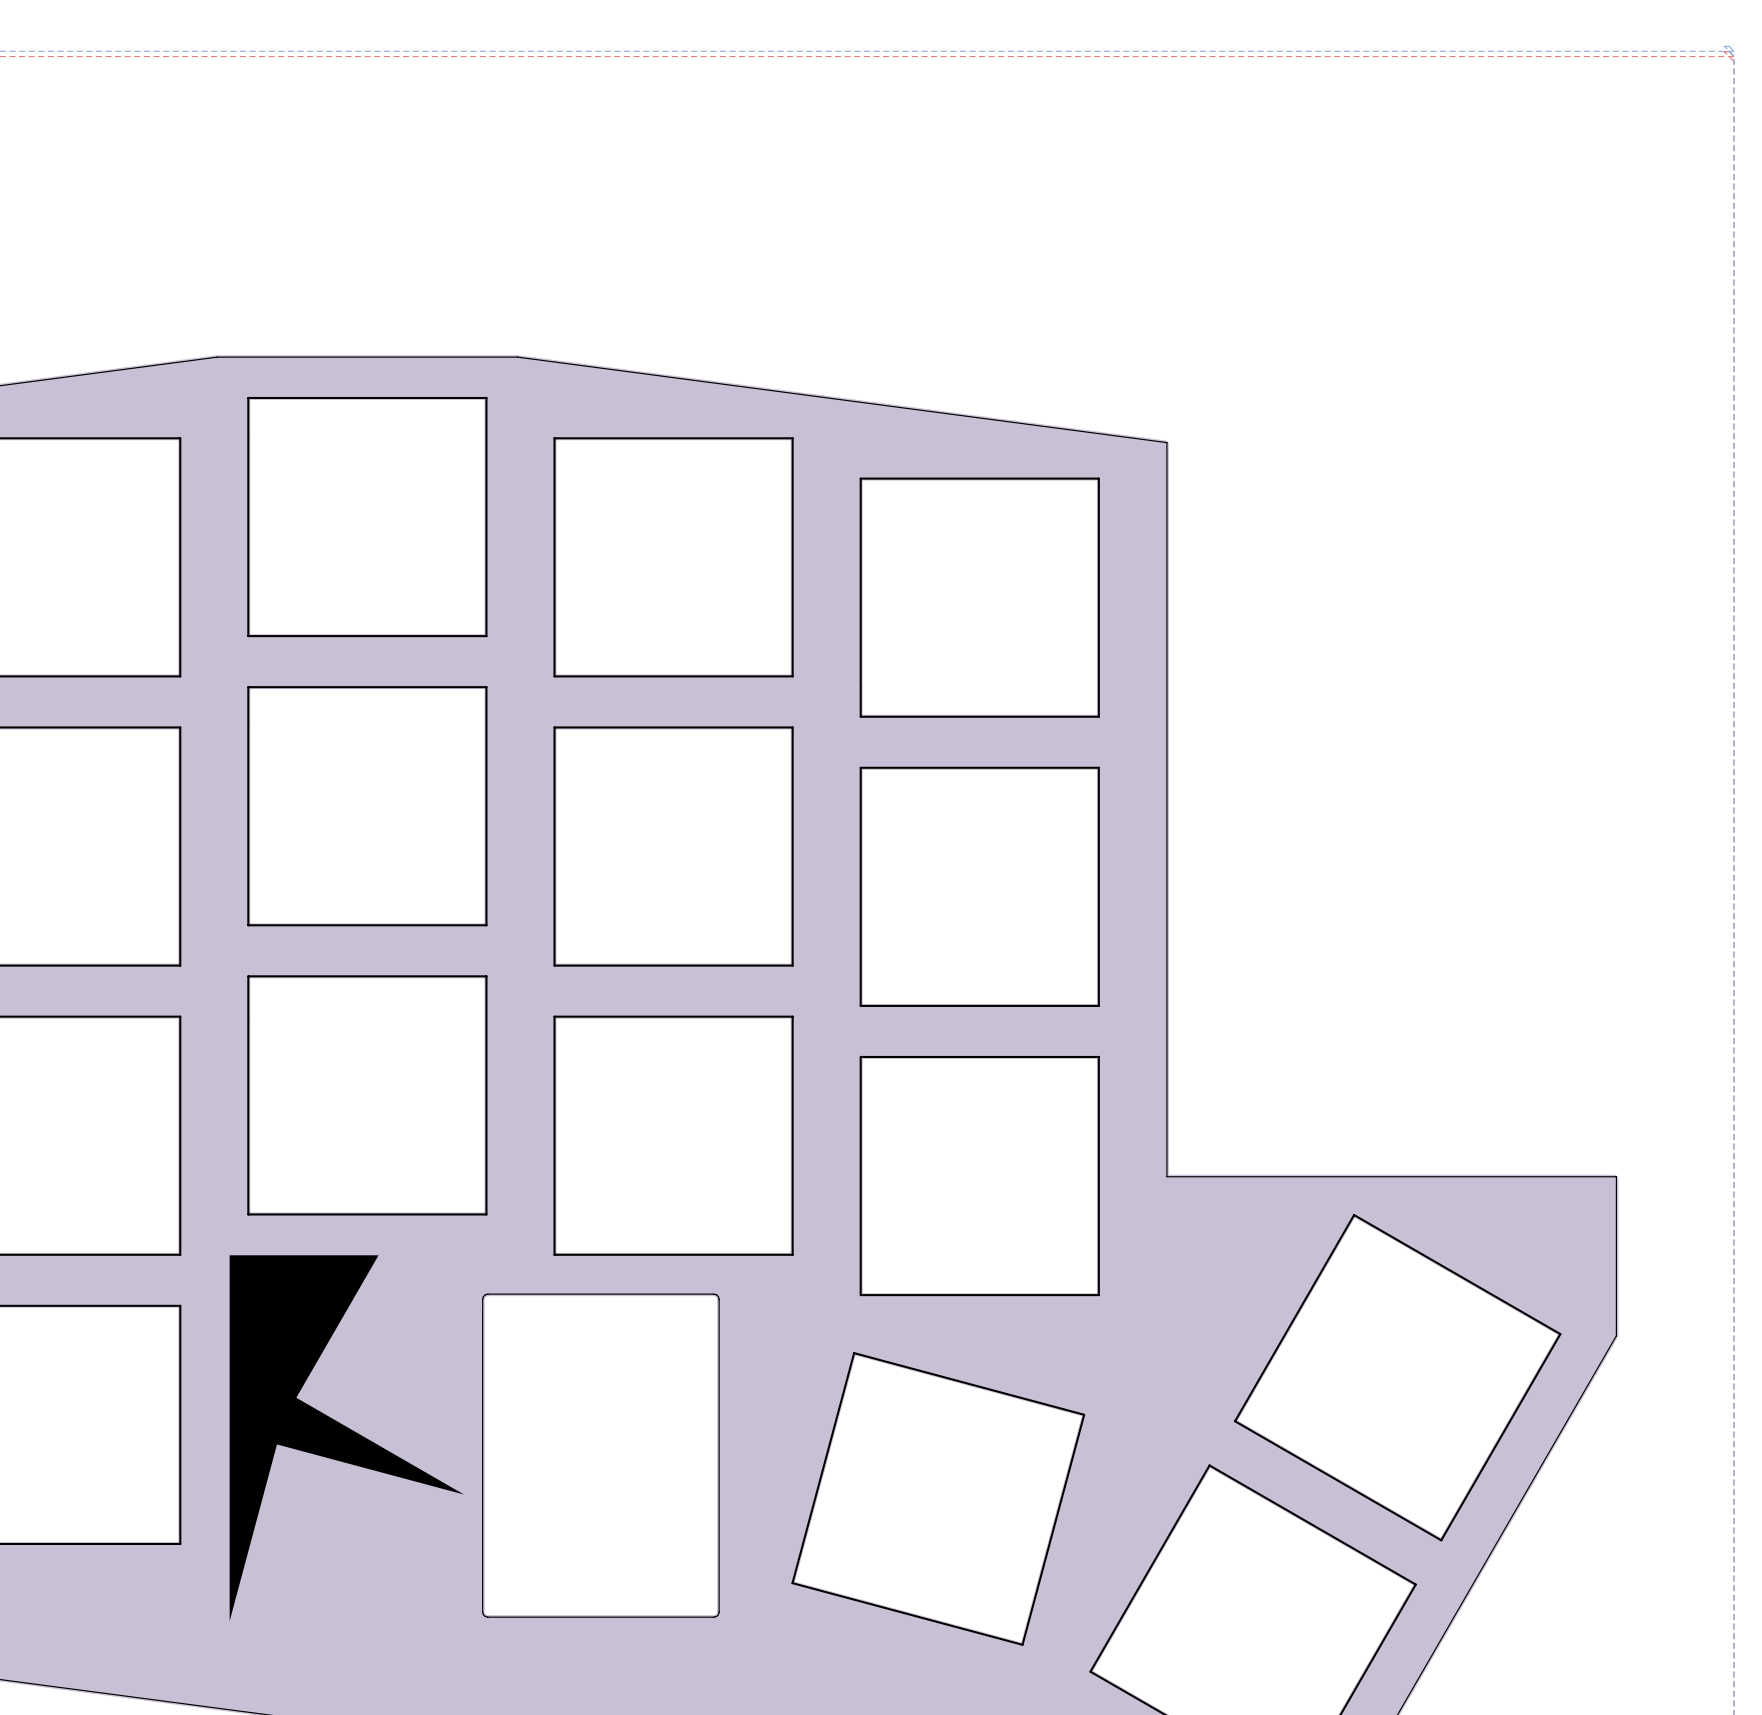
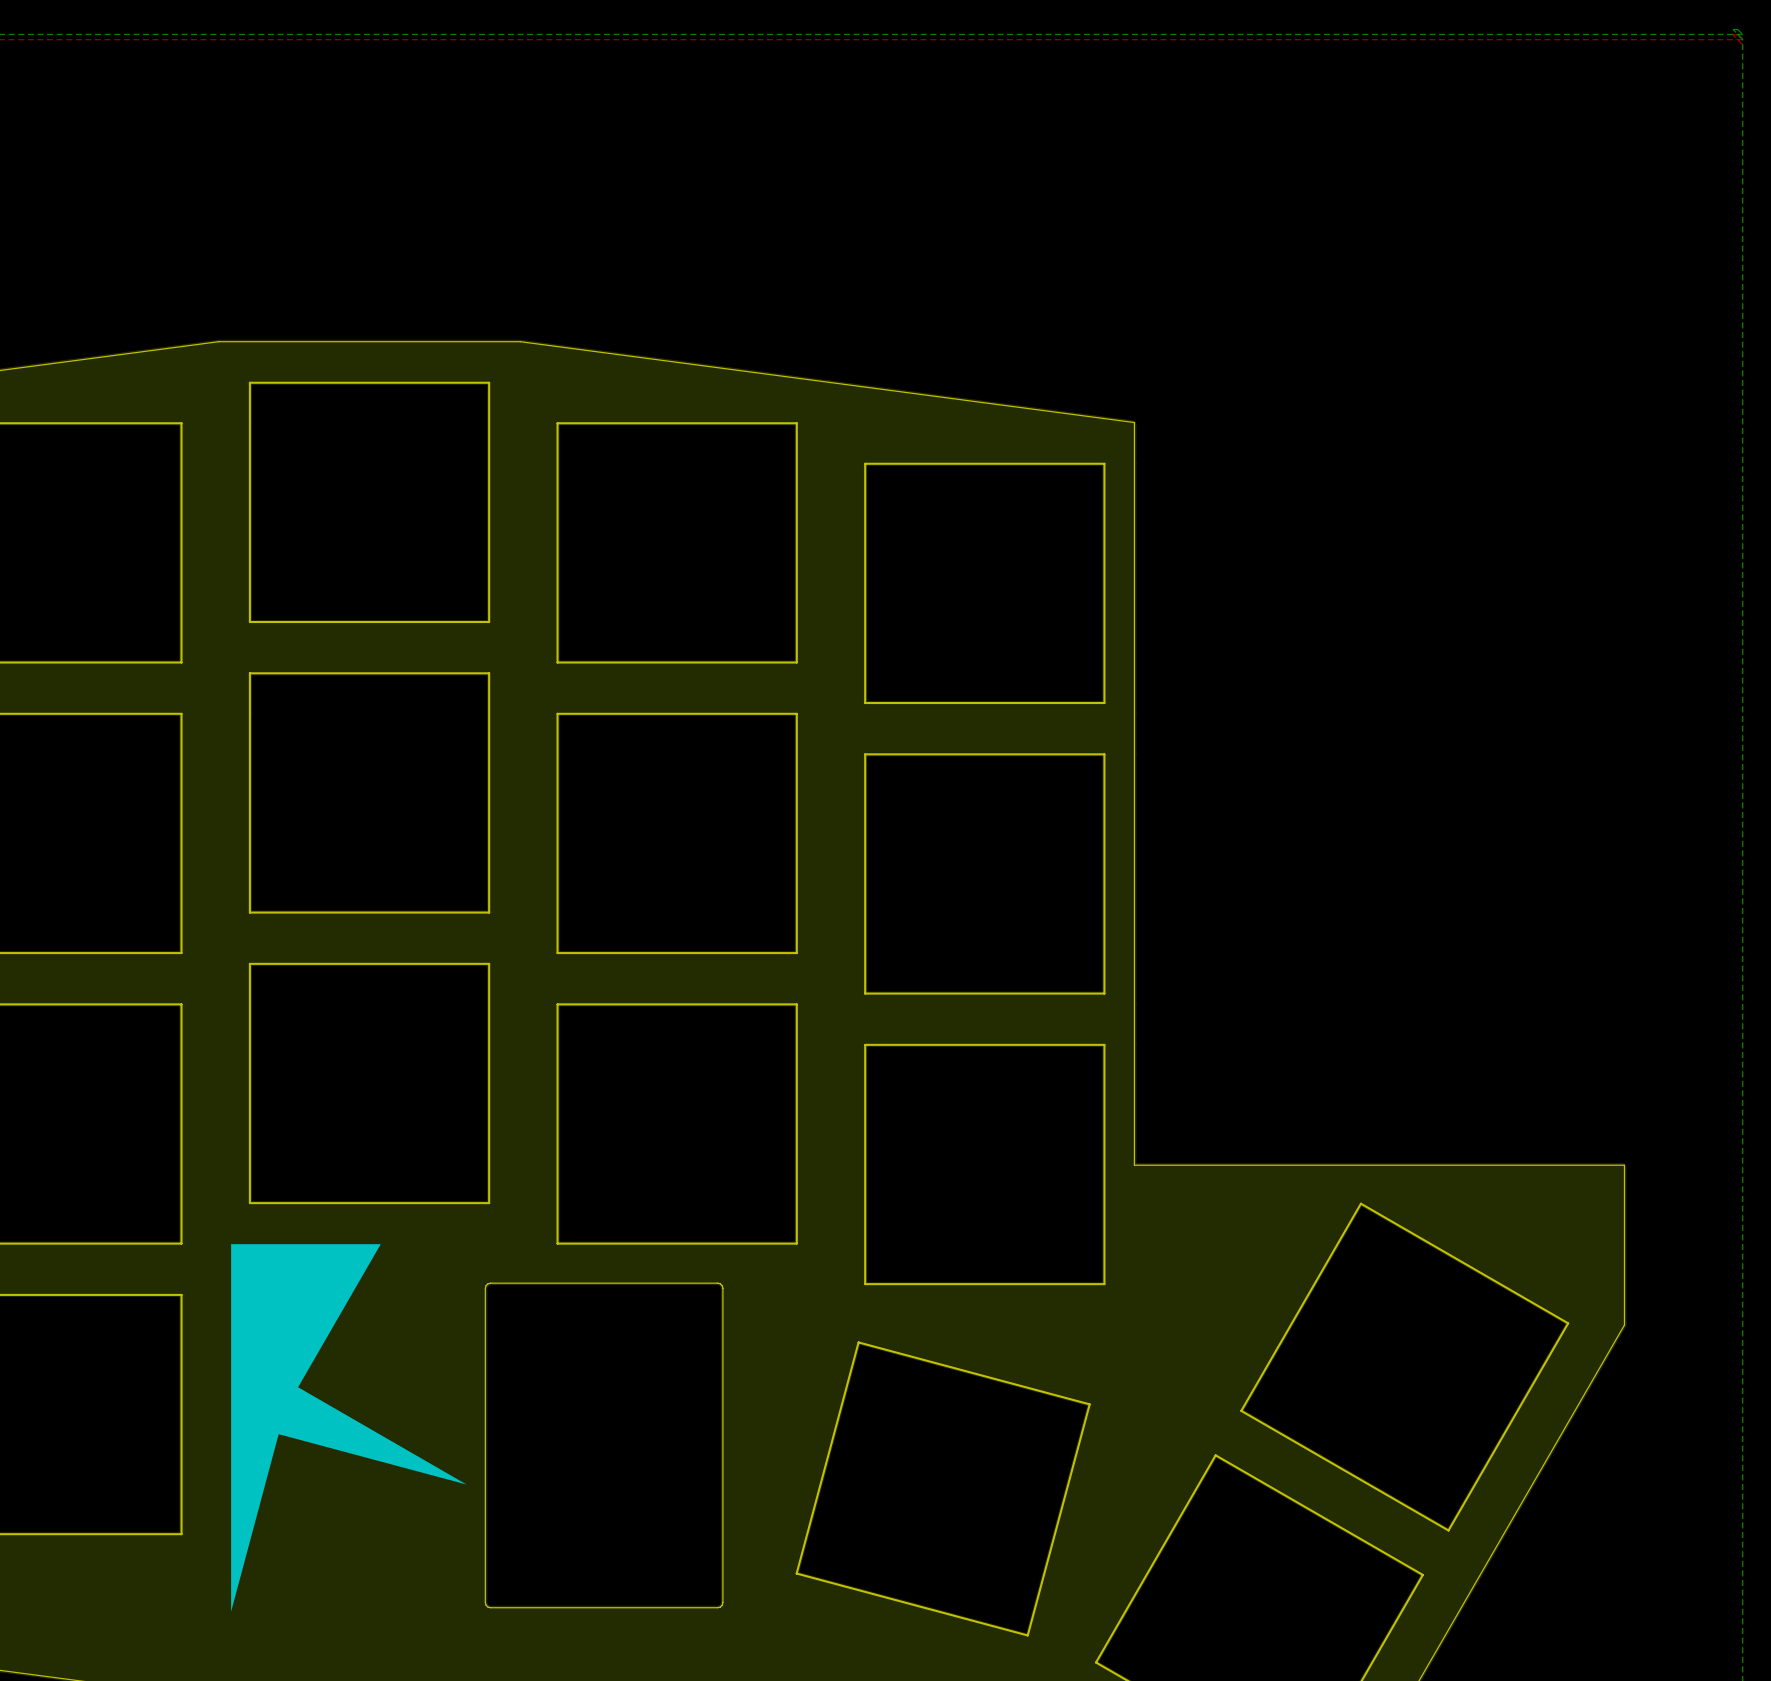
board edge: (1128, 437) (1166, 442) (1166, 1176) -> (1134, 422) (1134, 1165) (1172, 1165)

